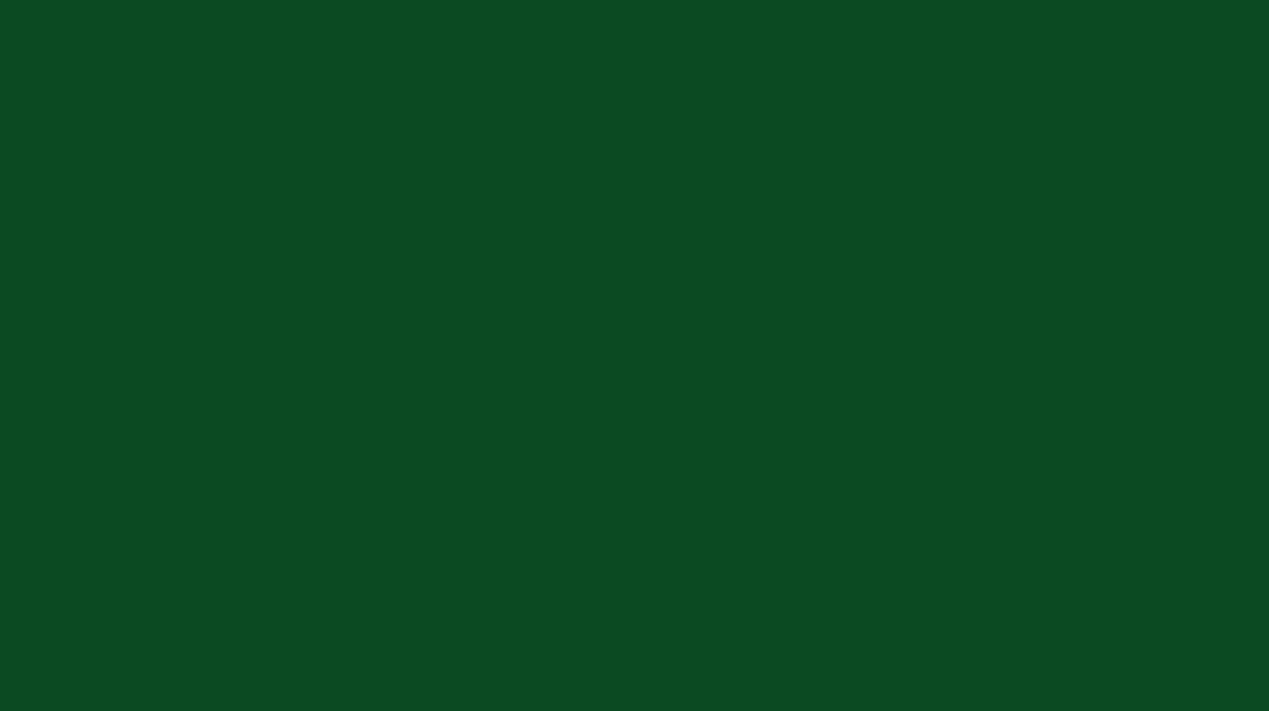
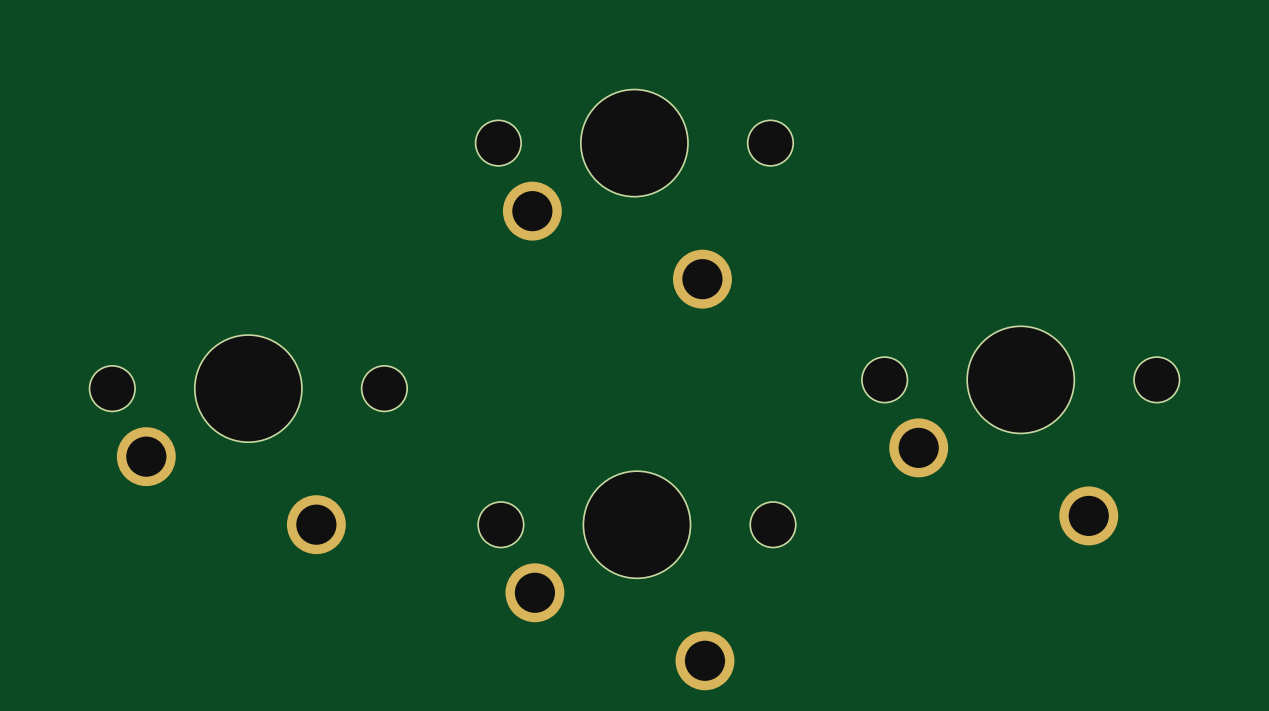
part: none -> (634, 199)
part: none -> (1020, 435)
part: none -> (248, 444)
part: none -> (636, 580)

